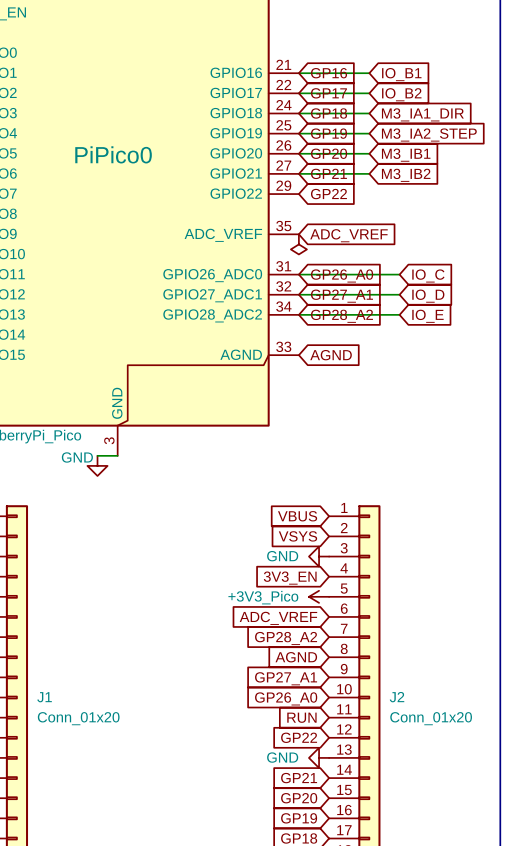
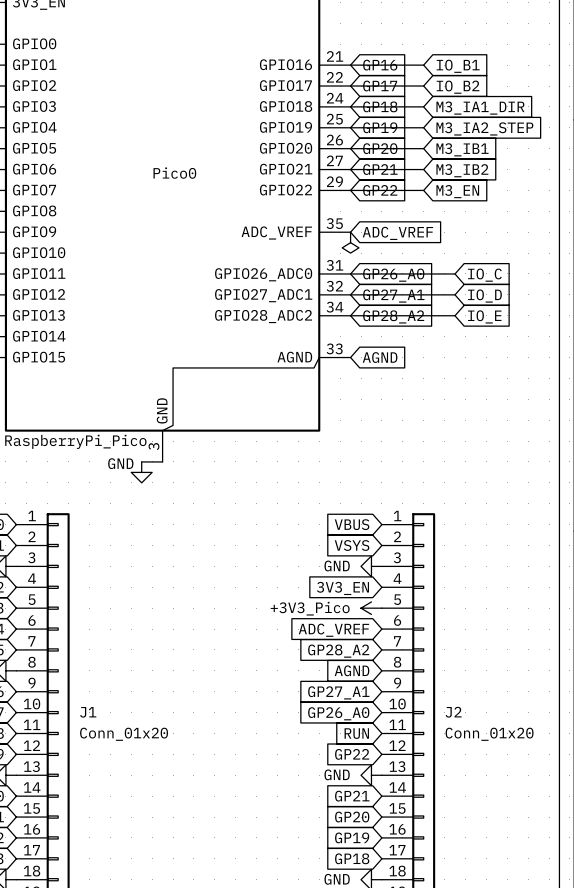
PiPico0 name: PiPico0 (113, 154) -> Pico0 (174, 173)
wire: none -> (350, 190) (423, 190)
global label: none -> M3_EN (457, 191)

